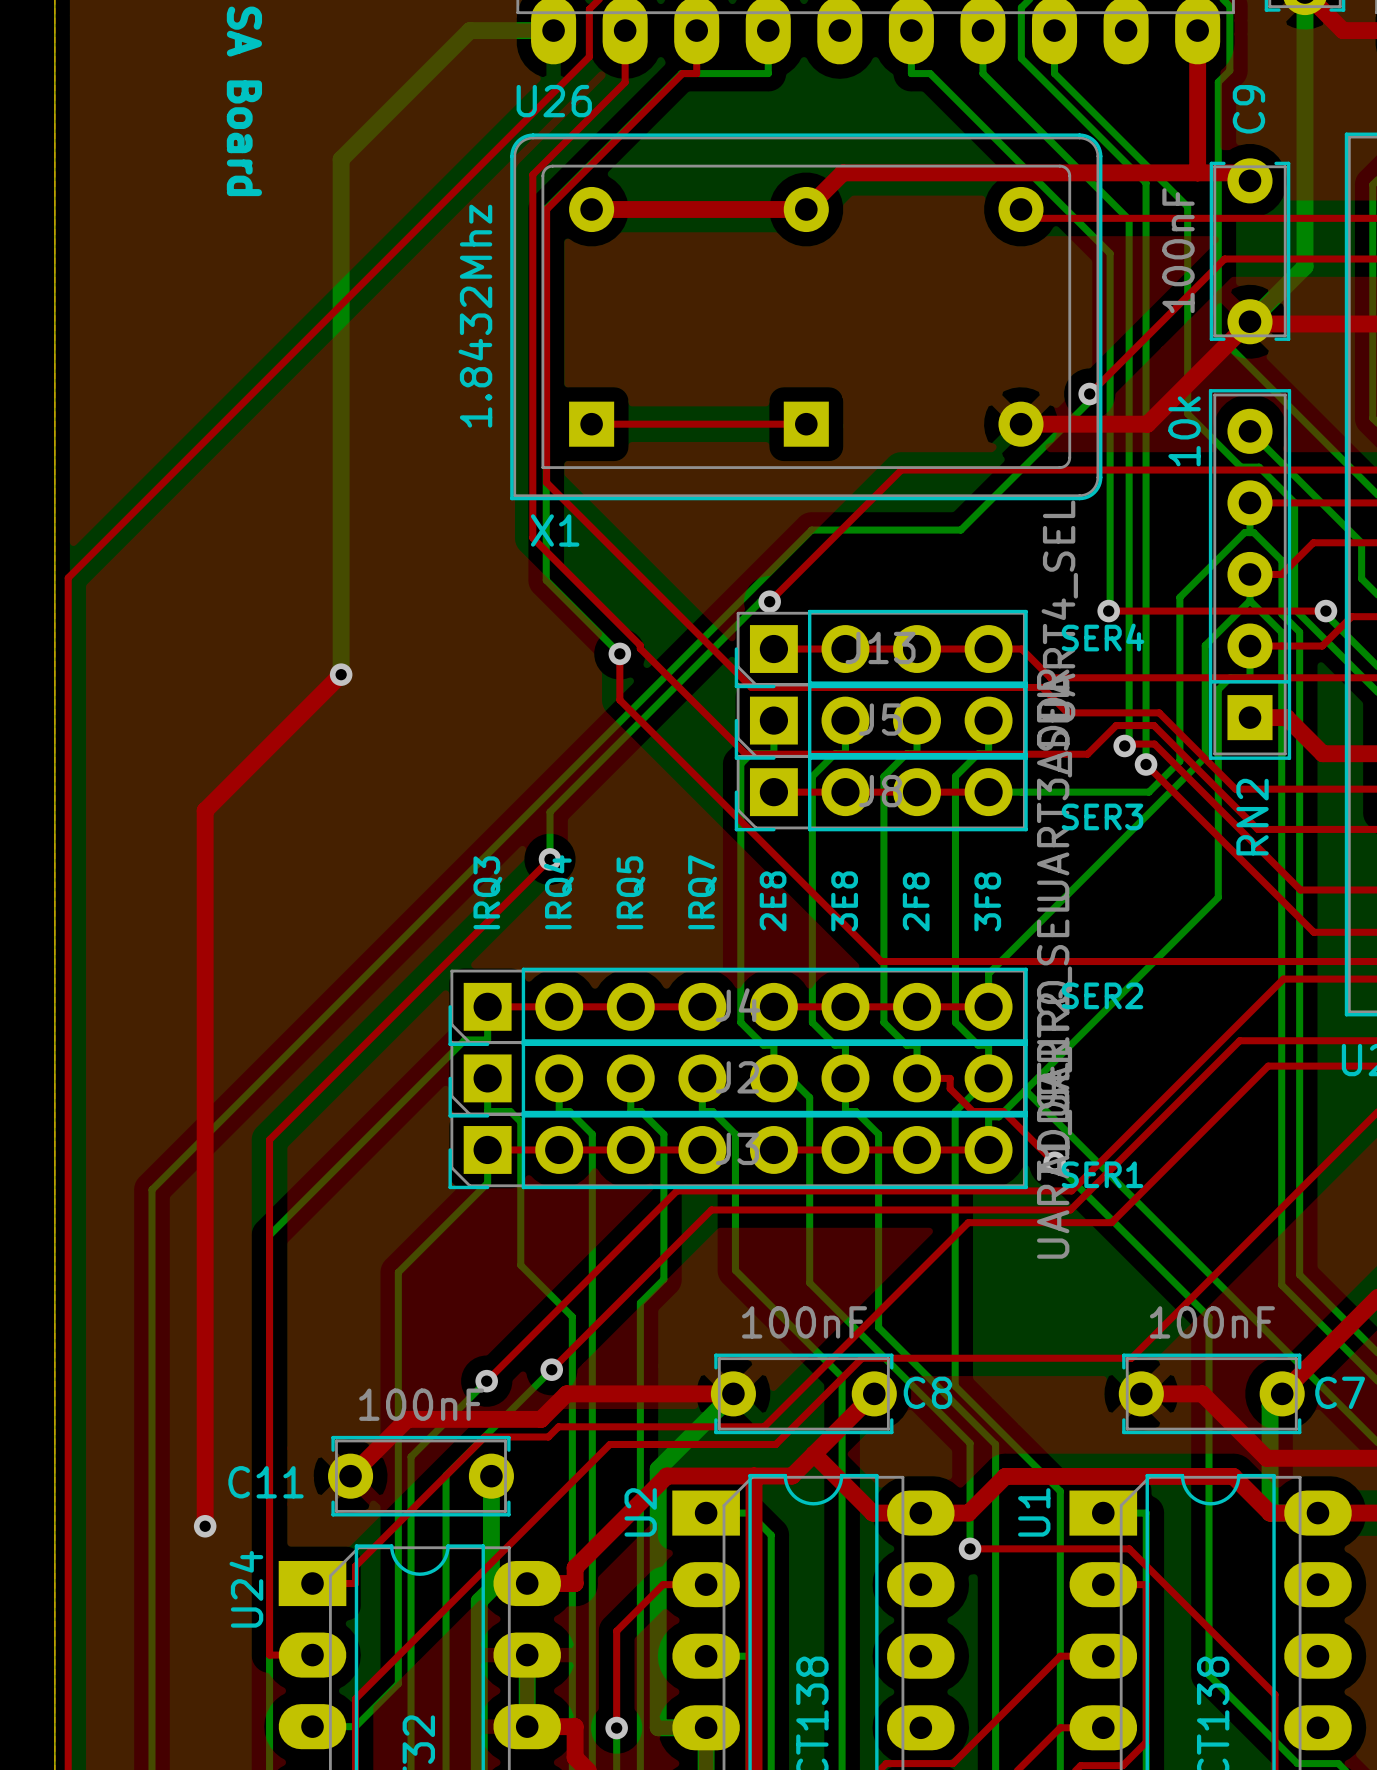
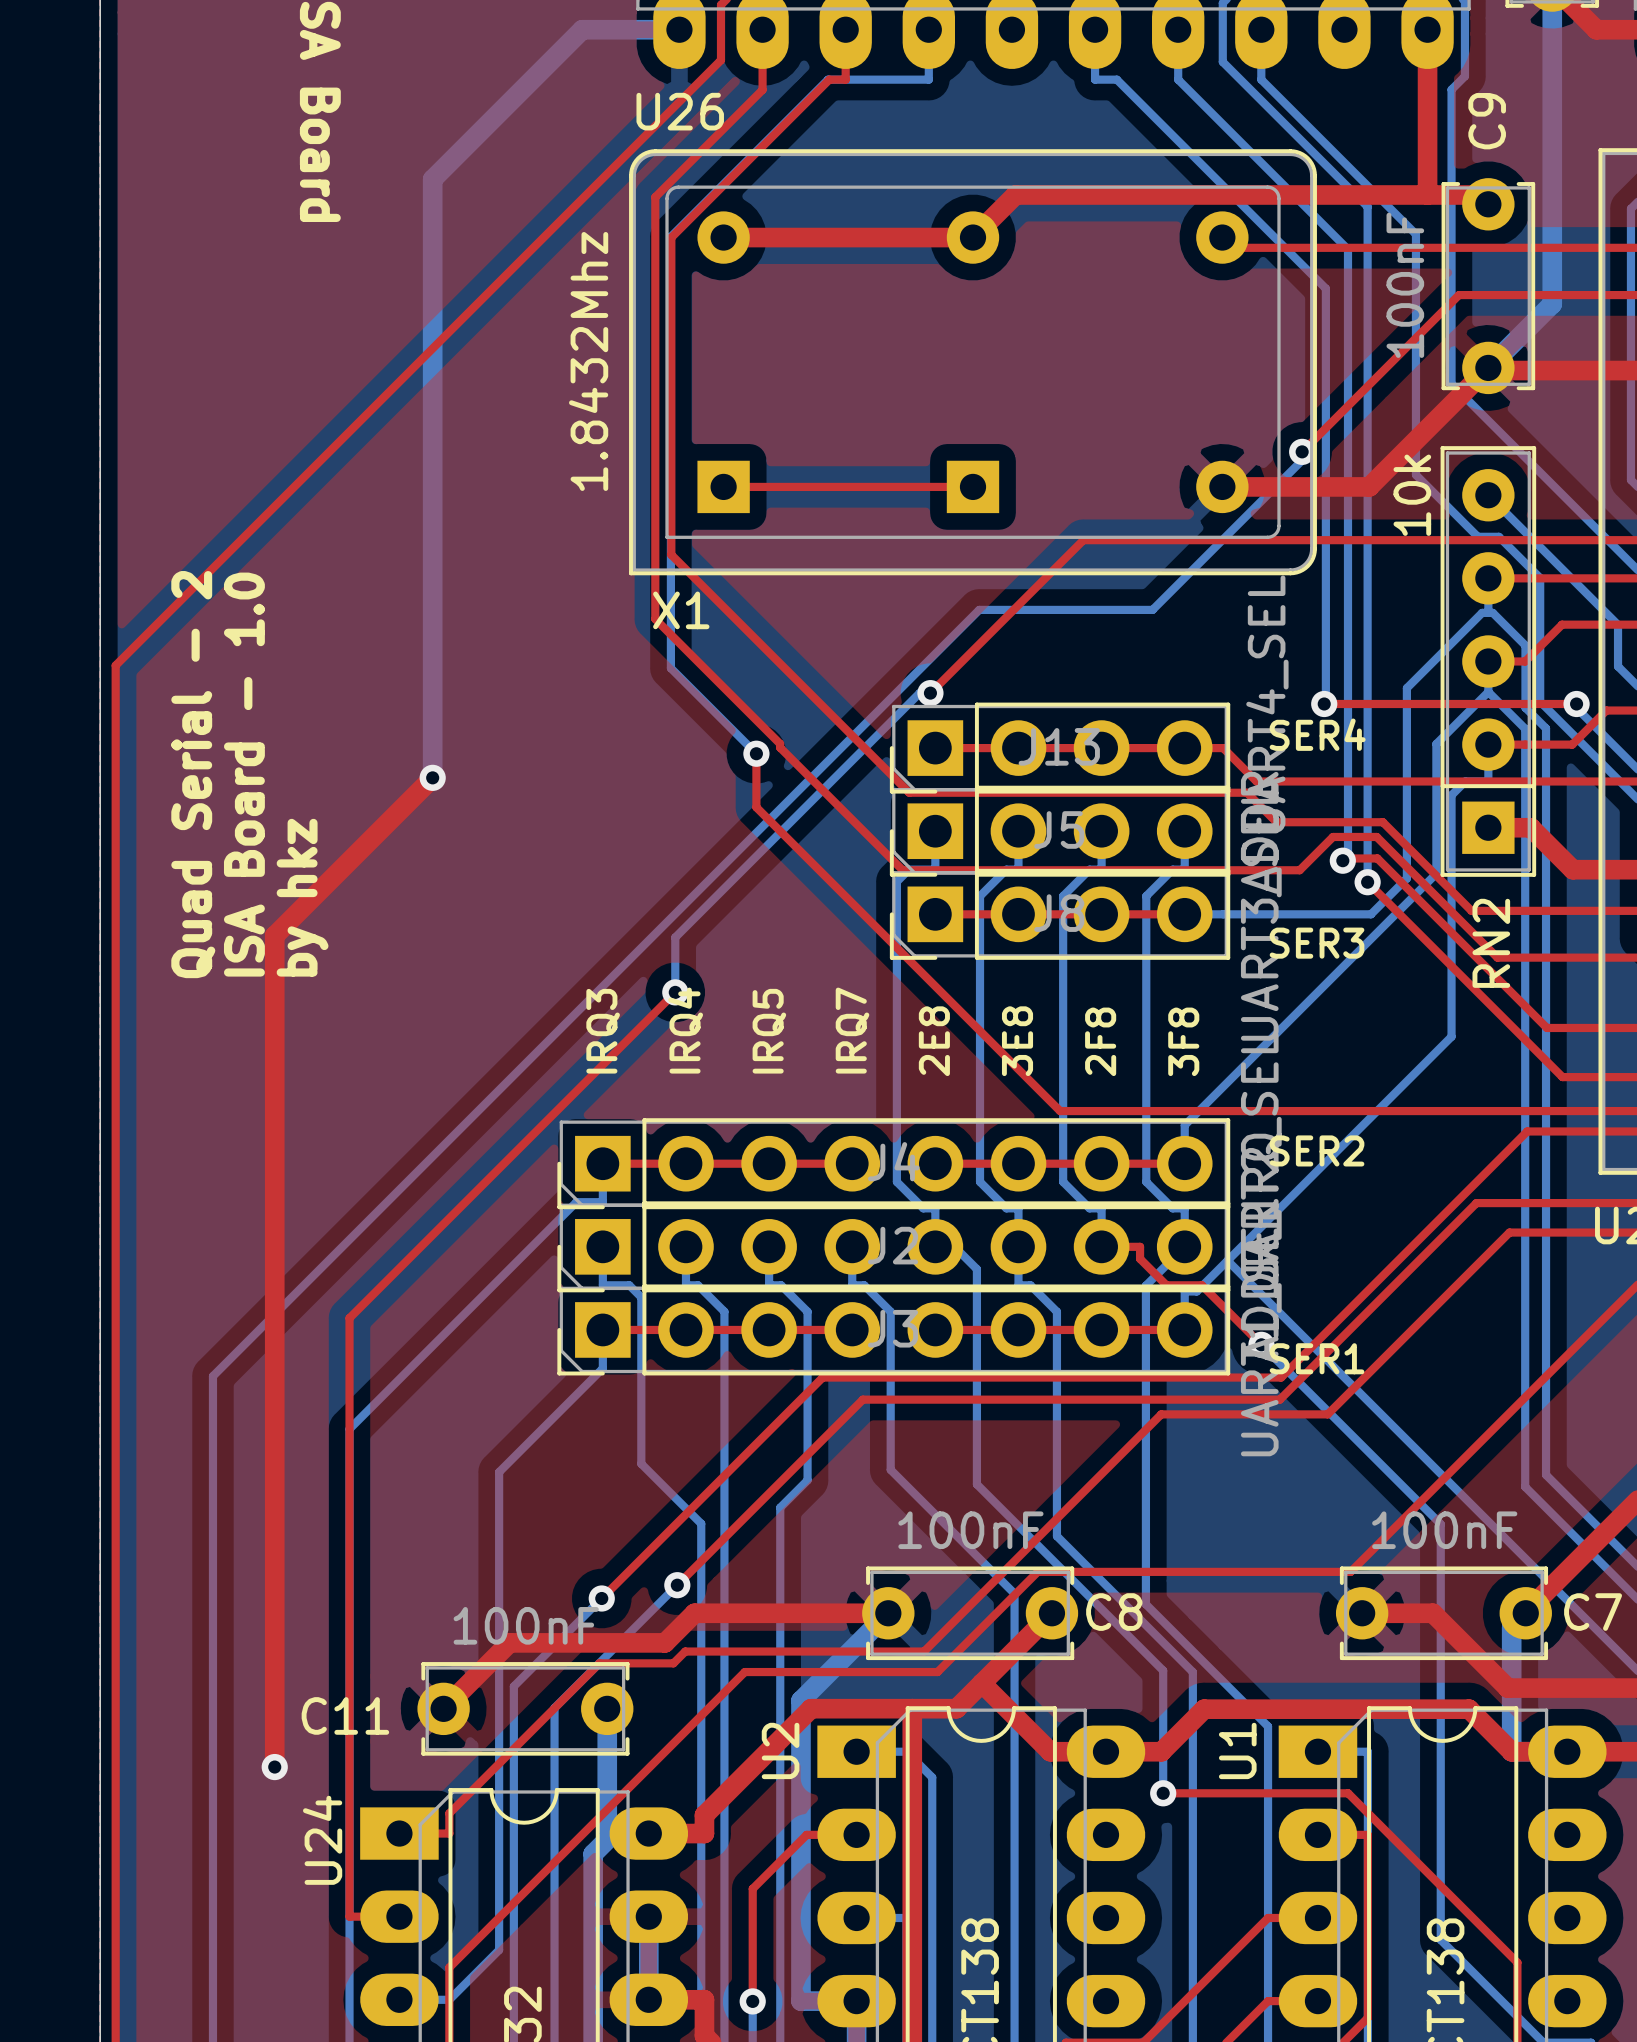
text: none -> Quad Serial - 2 (193, 774)
text: none -> ISA Board - 1.0 (244, 774)
text: none -> by hkz (302, 897)

